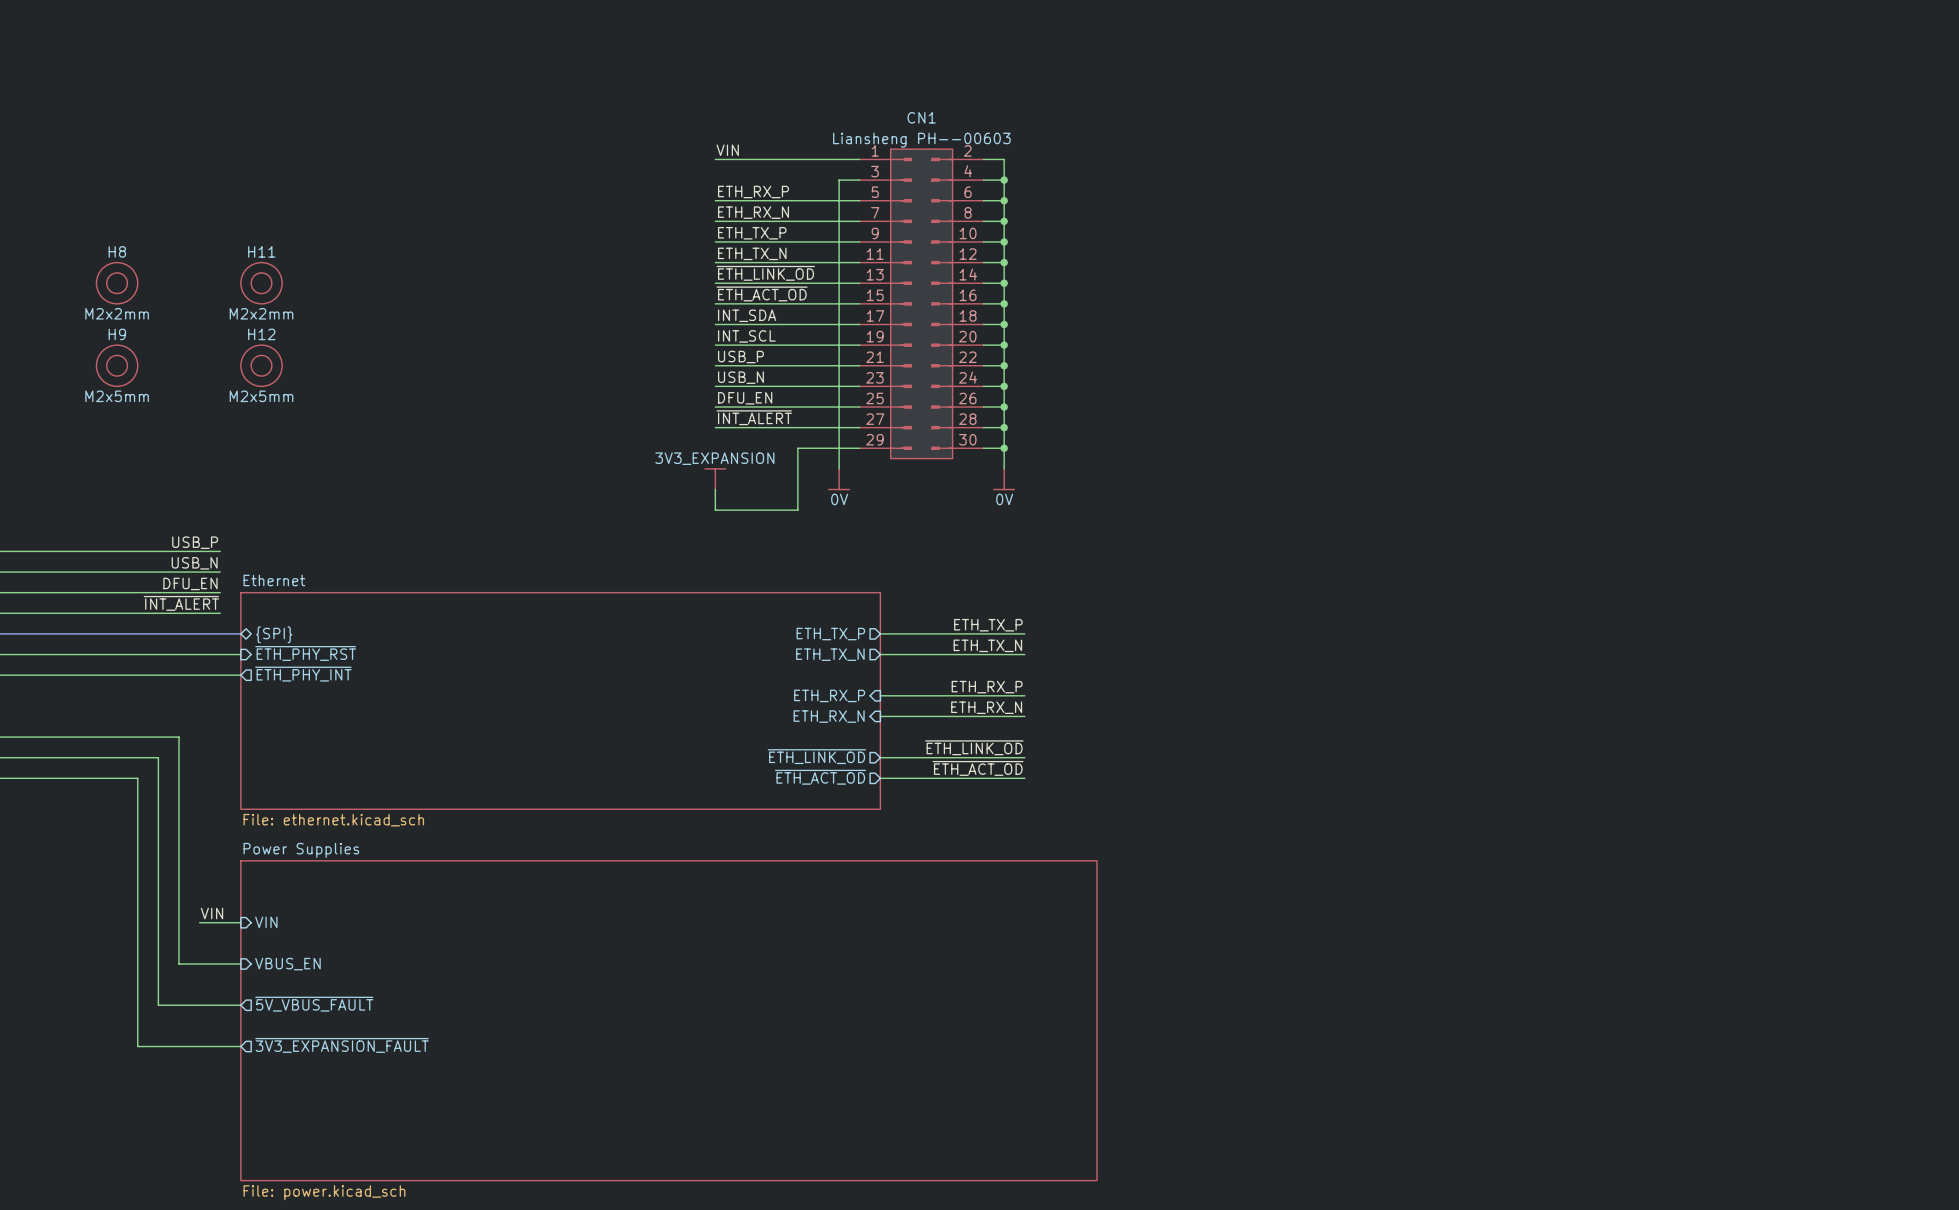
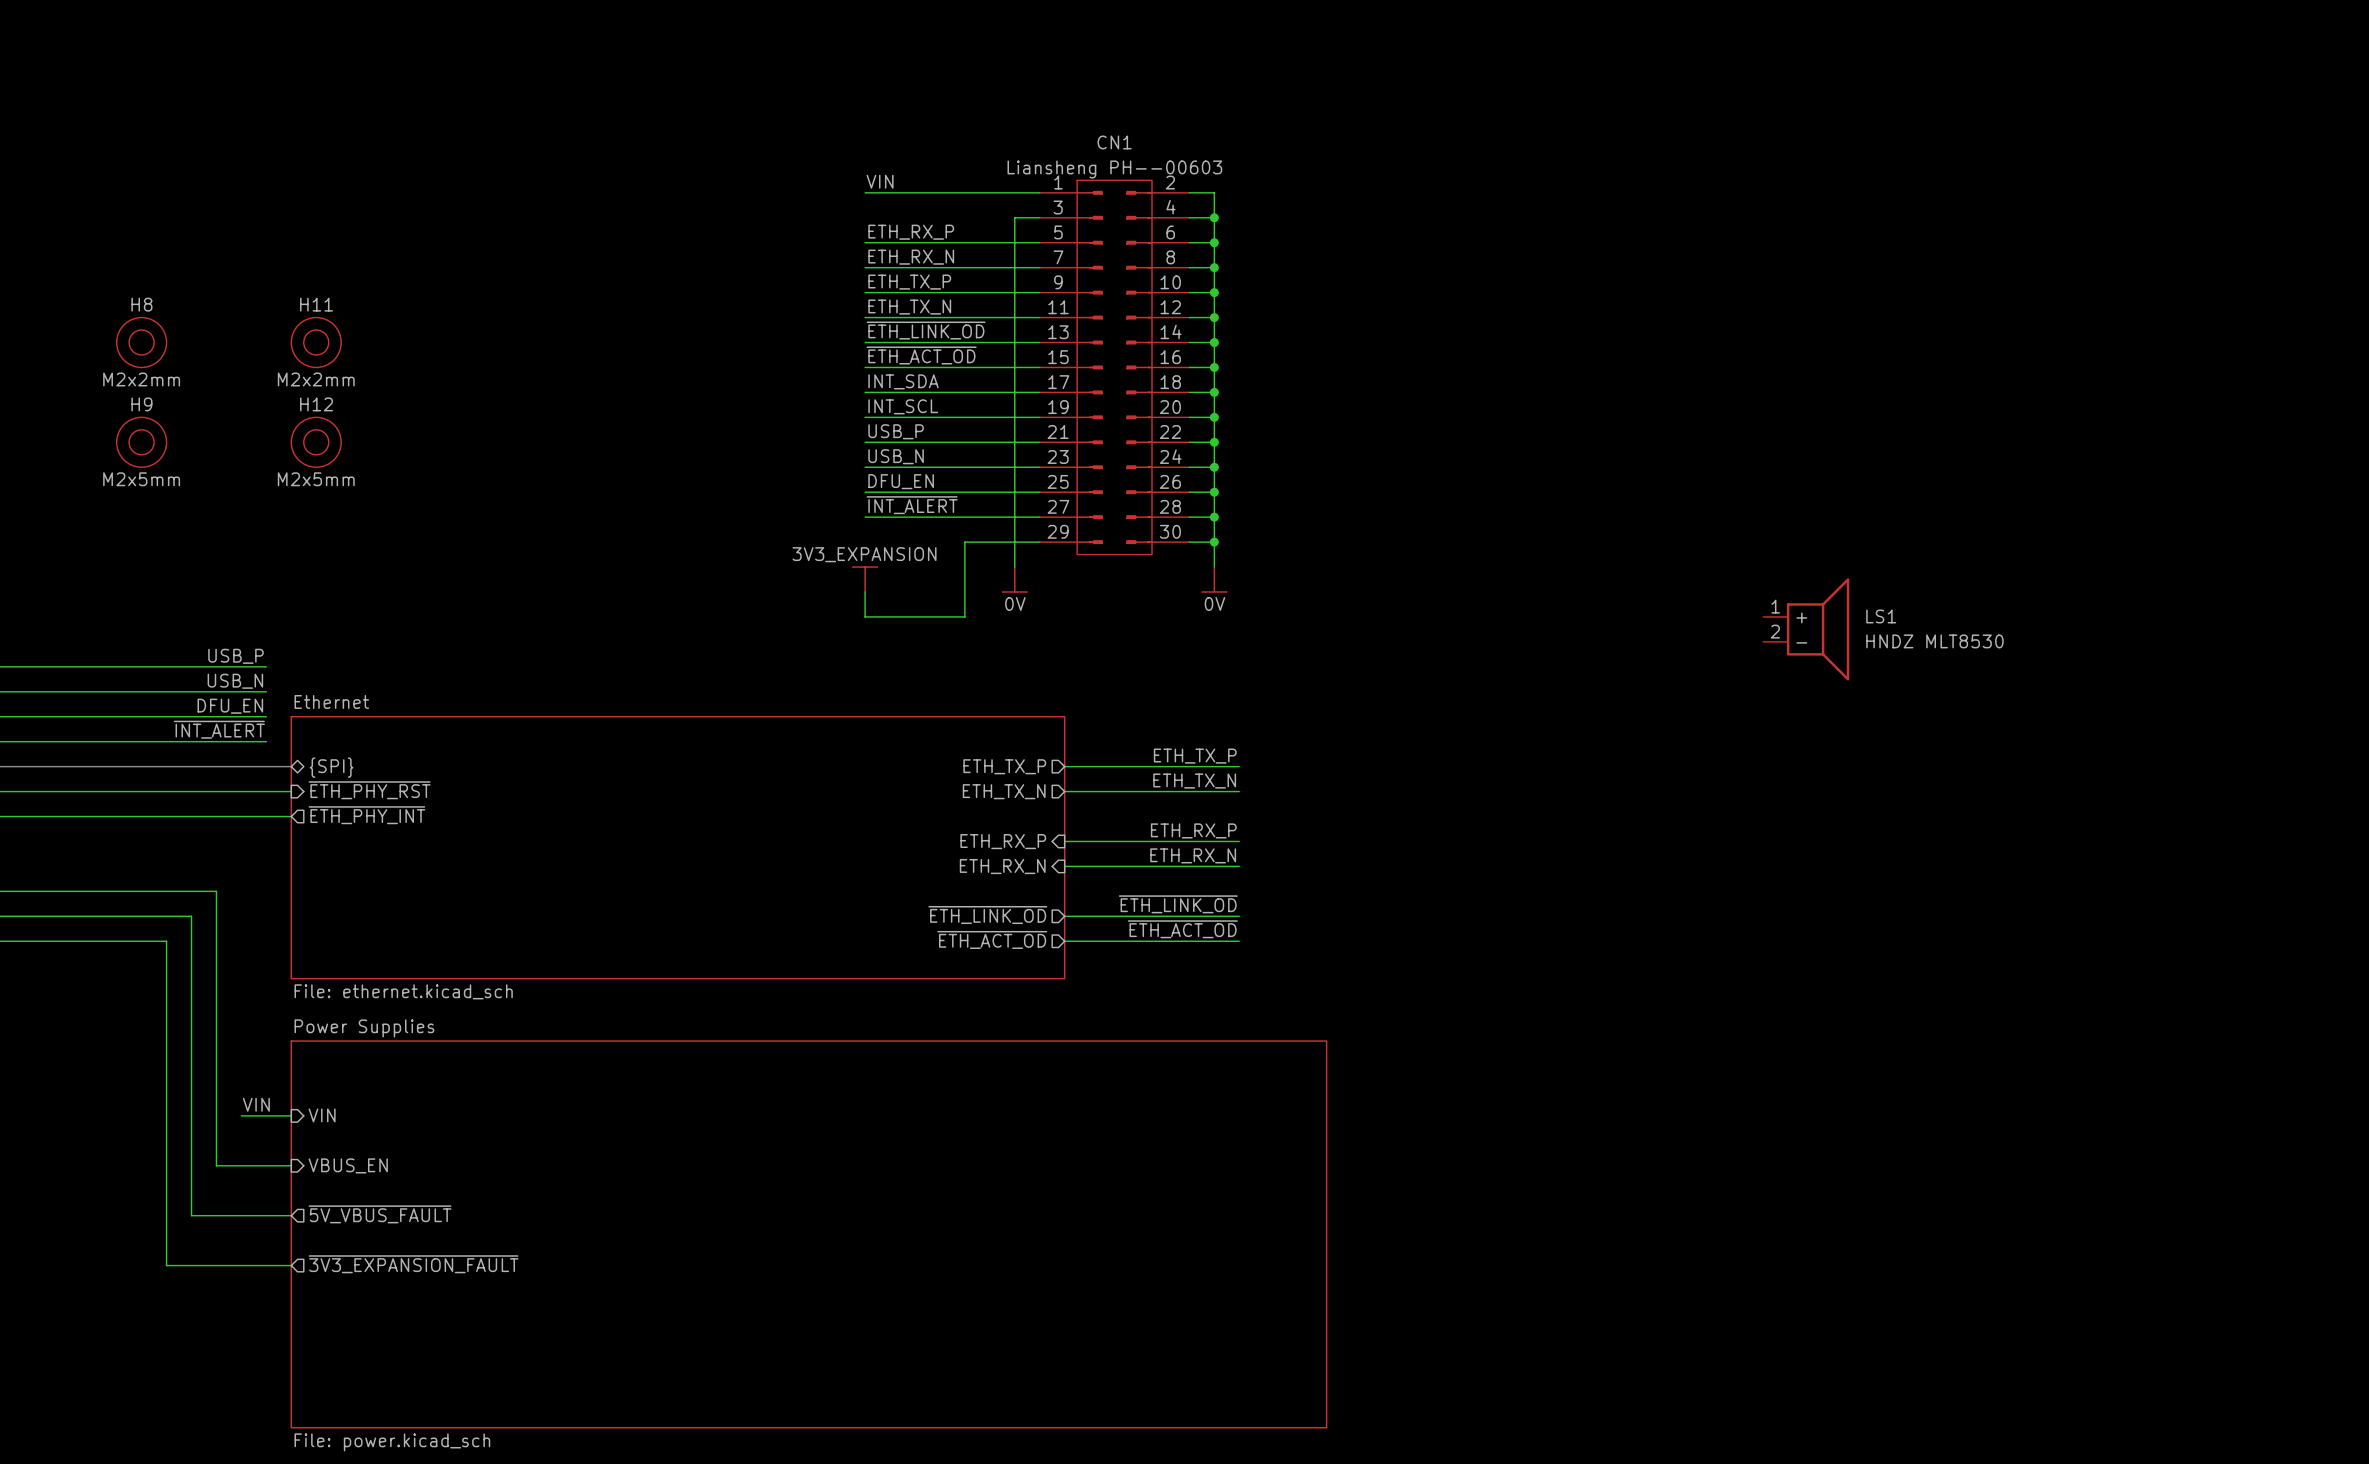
LS1: none -> HNDZ MLT8530 (1806, 629)

